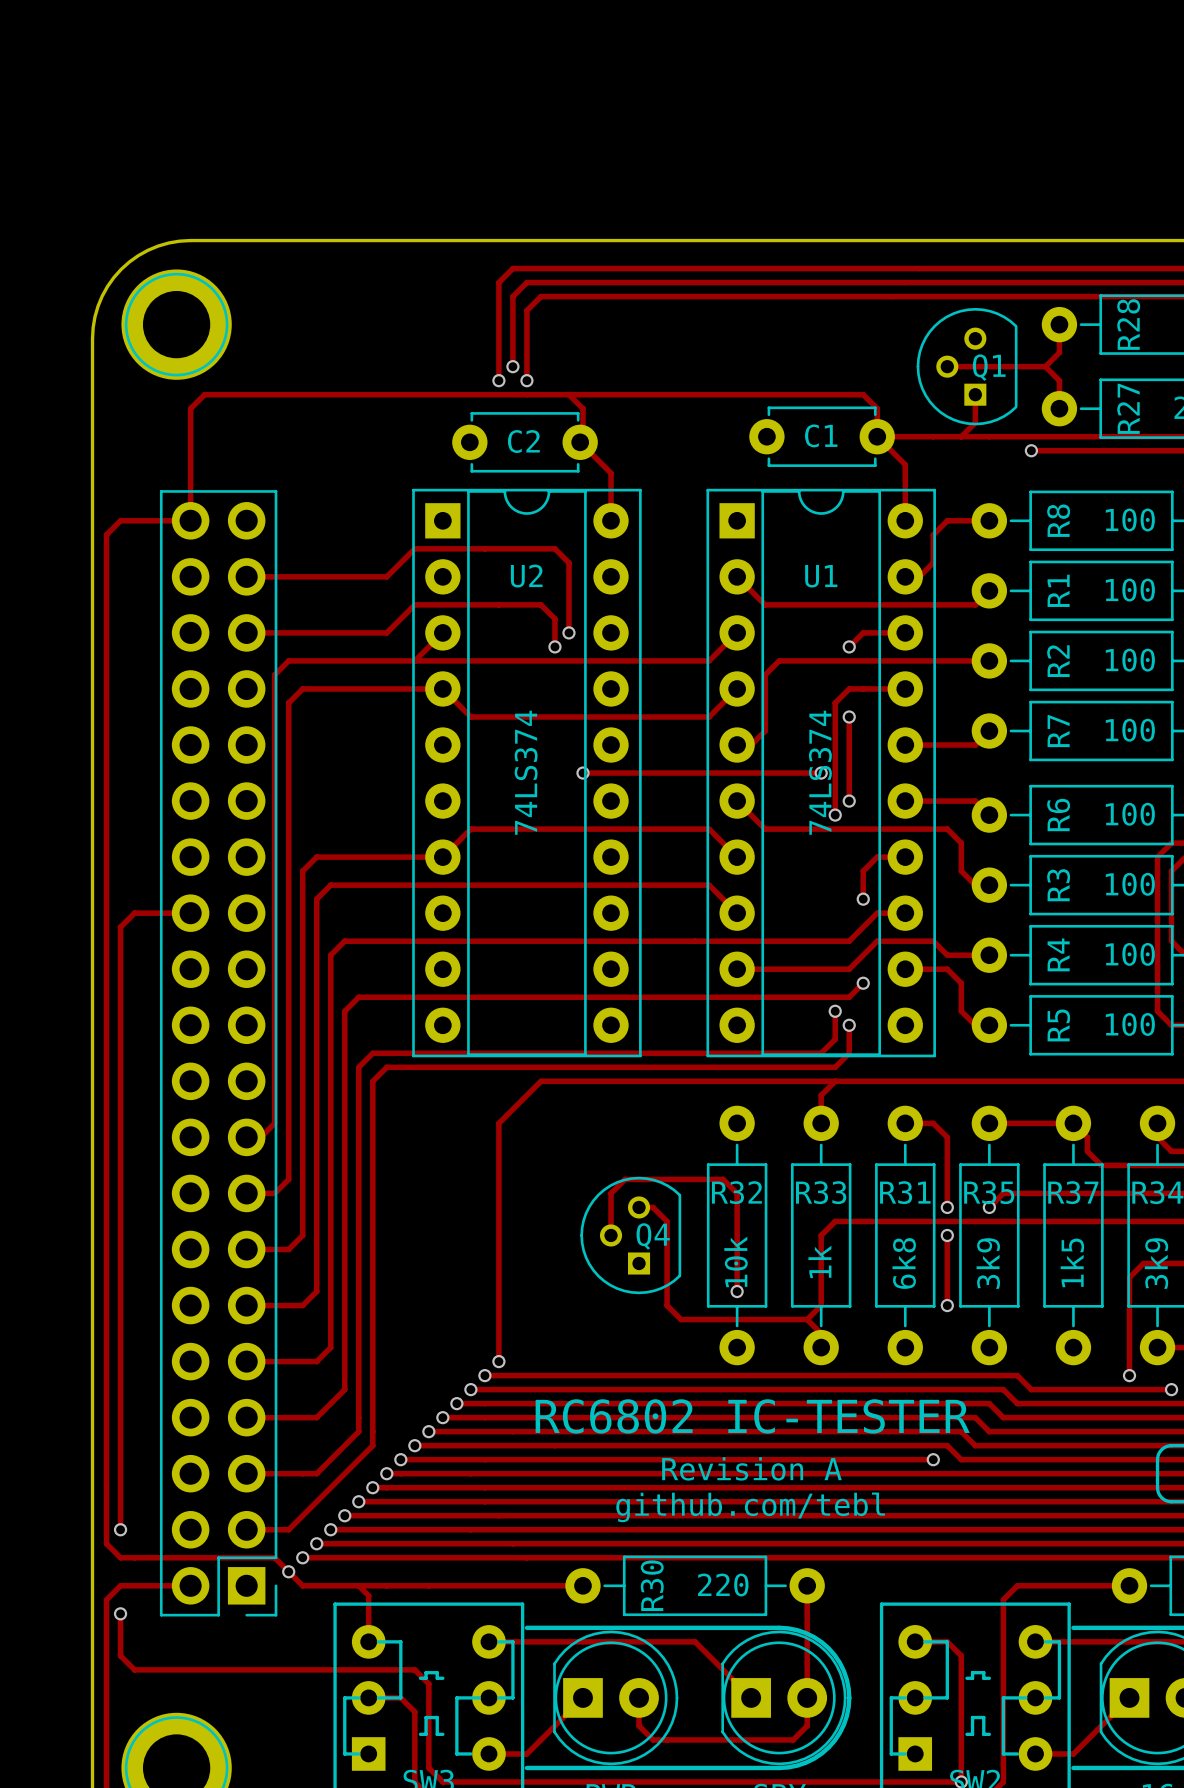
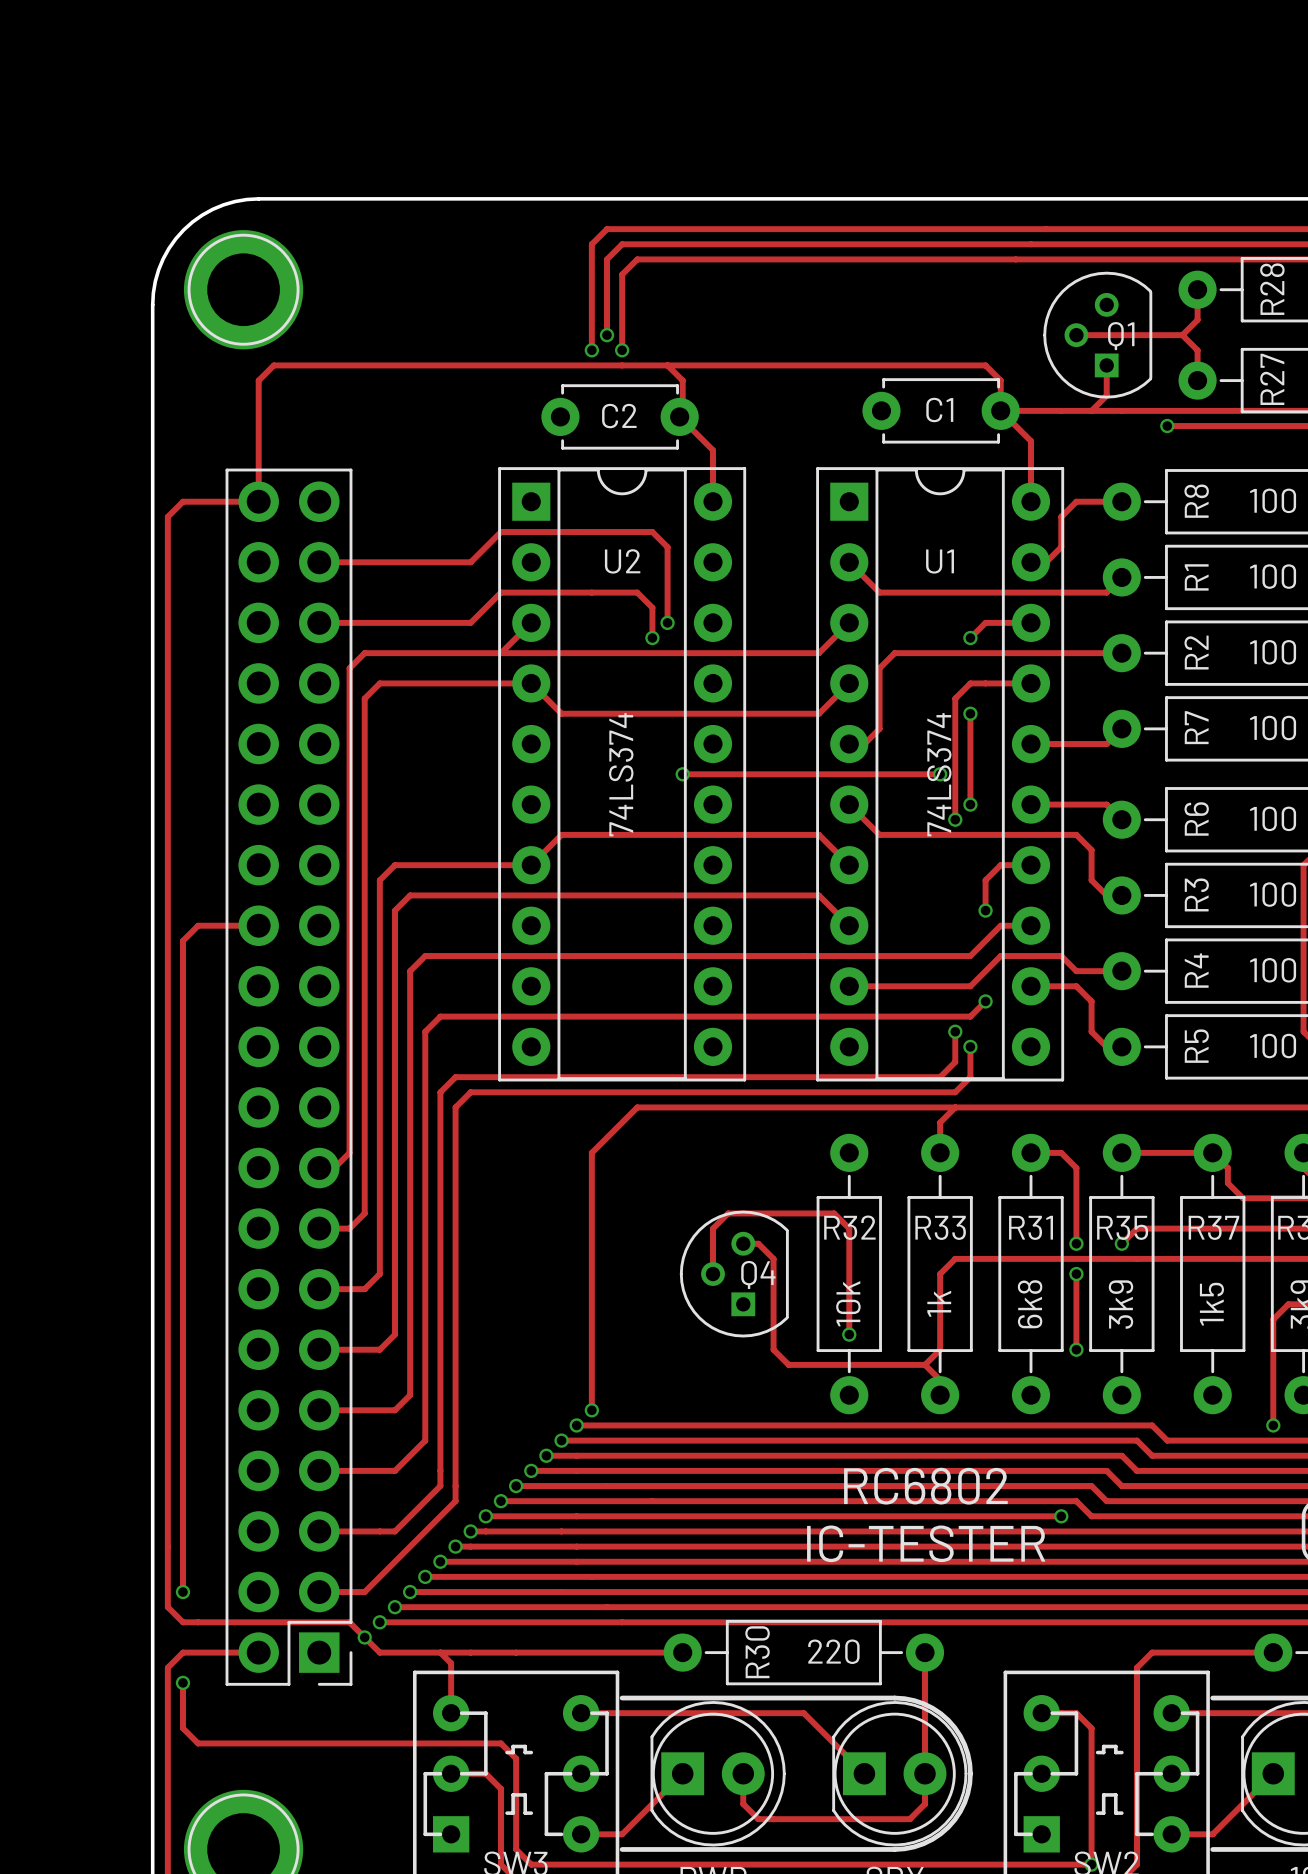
text: RC6802 IC-TESTER (752, 1416) -> IC-TESTER (926, 1543)
text: none -> RC6802 (925, 1486)
text: Revision A (751, 1468) -> none
text: github.com/tebl (750, 1507) -> none

